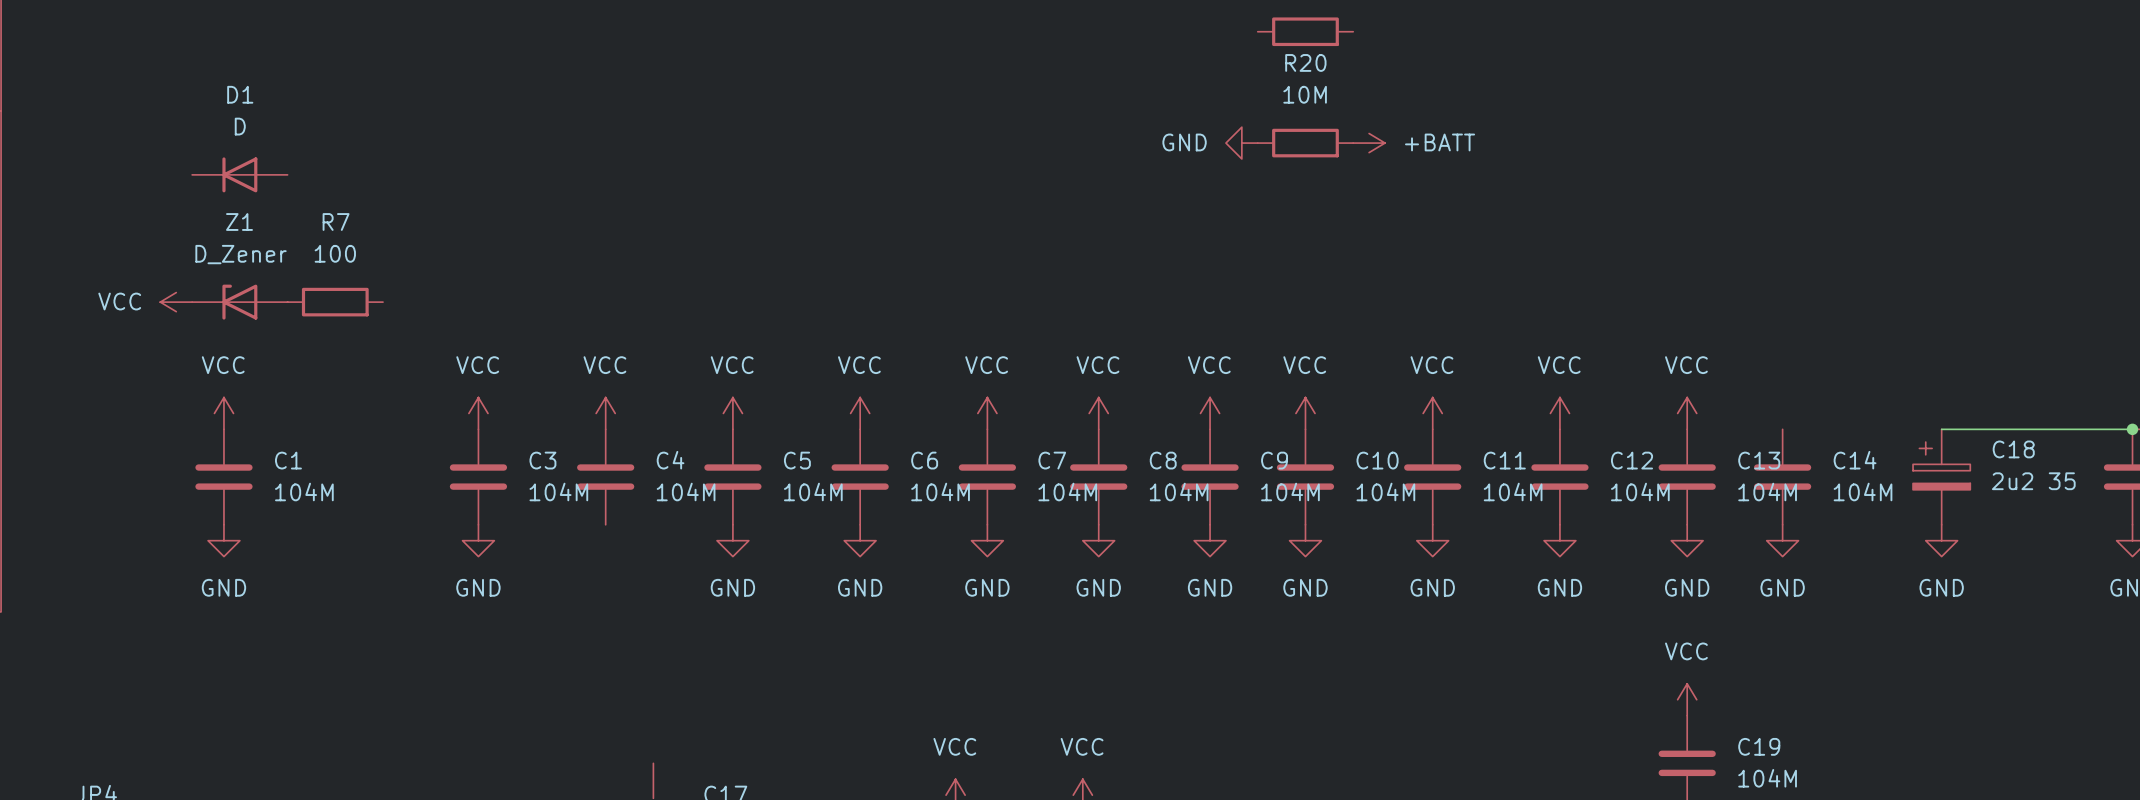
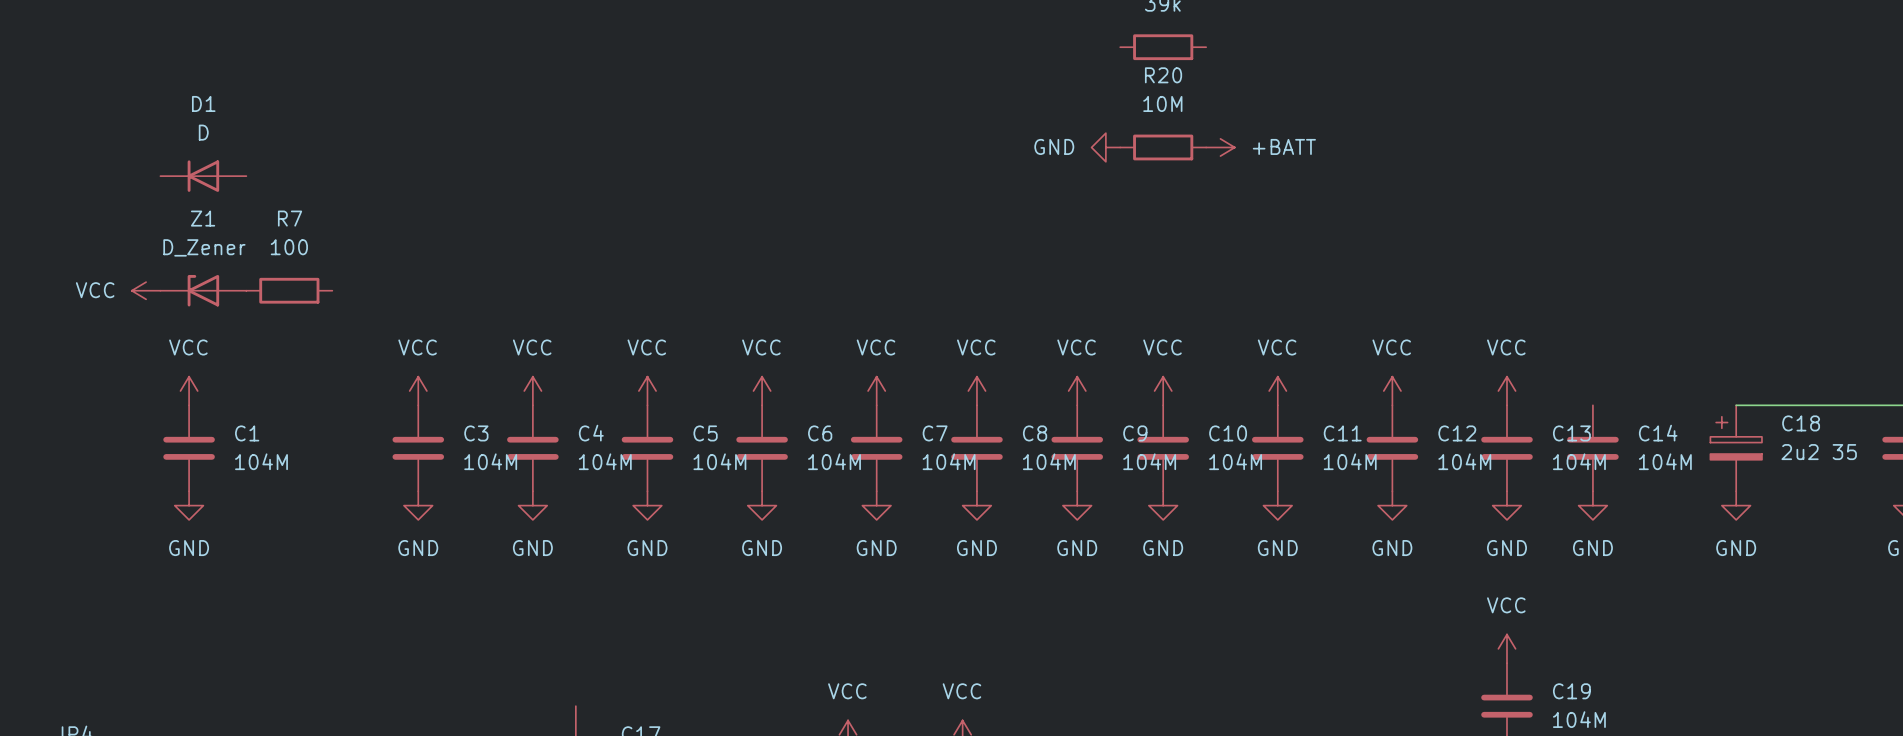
power symbol: none -> GND (532, 505)

